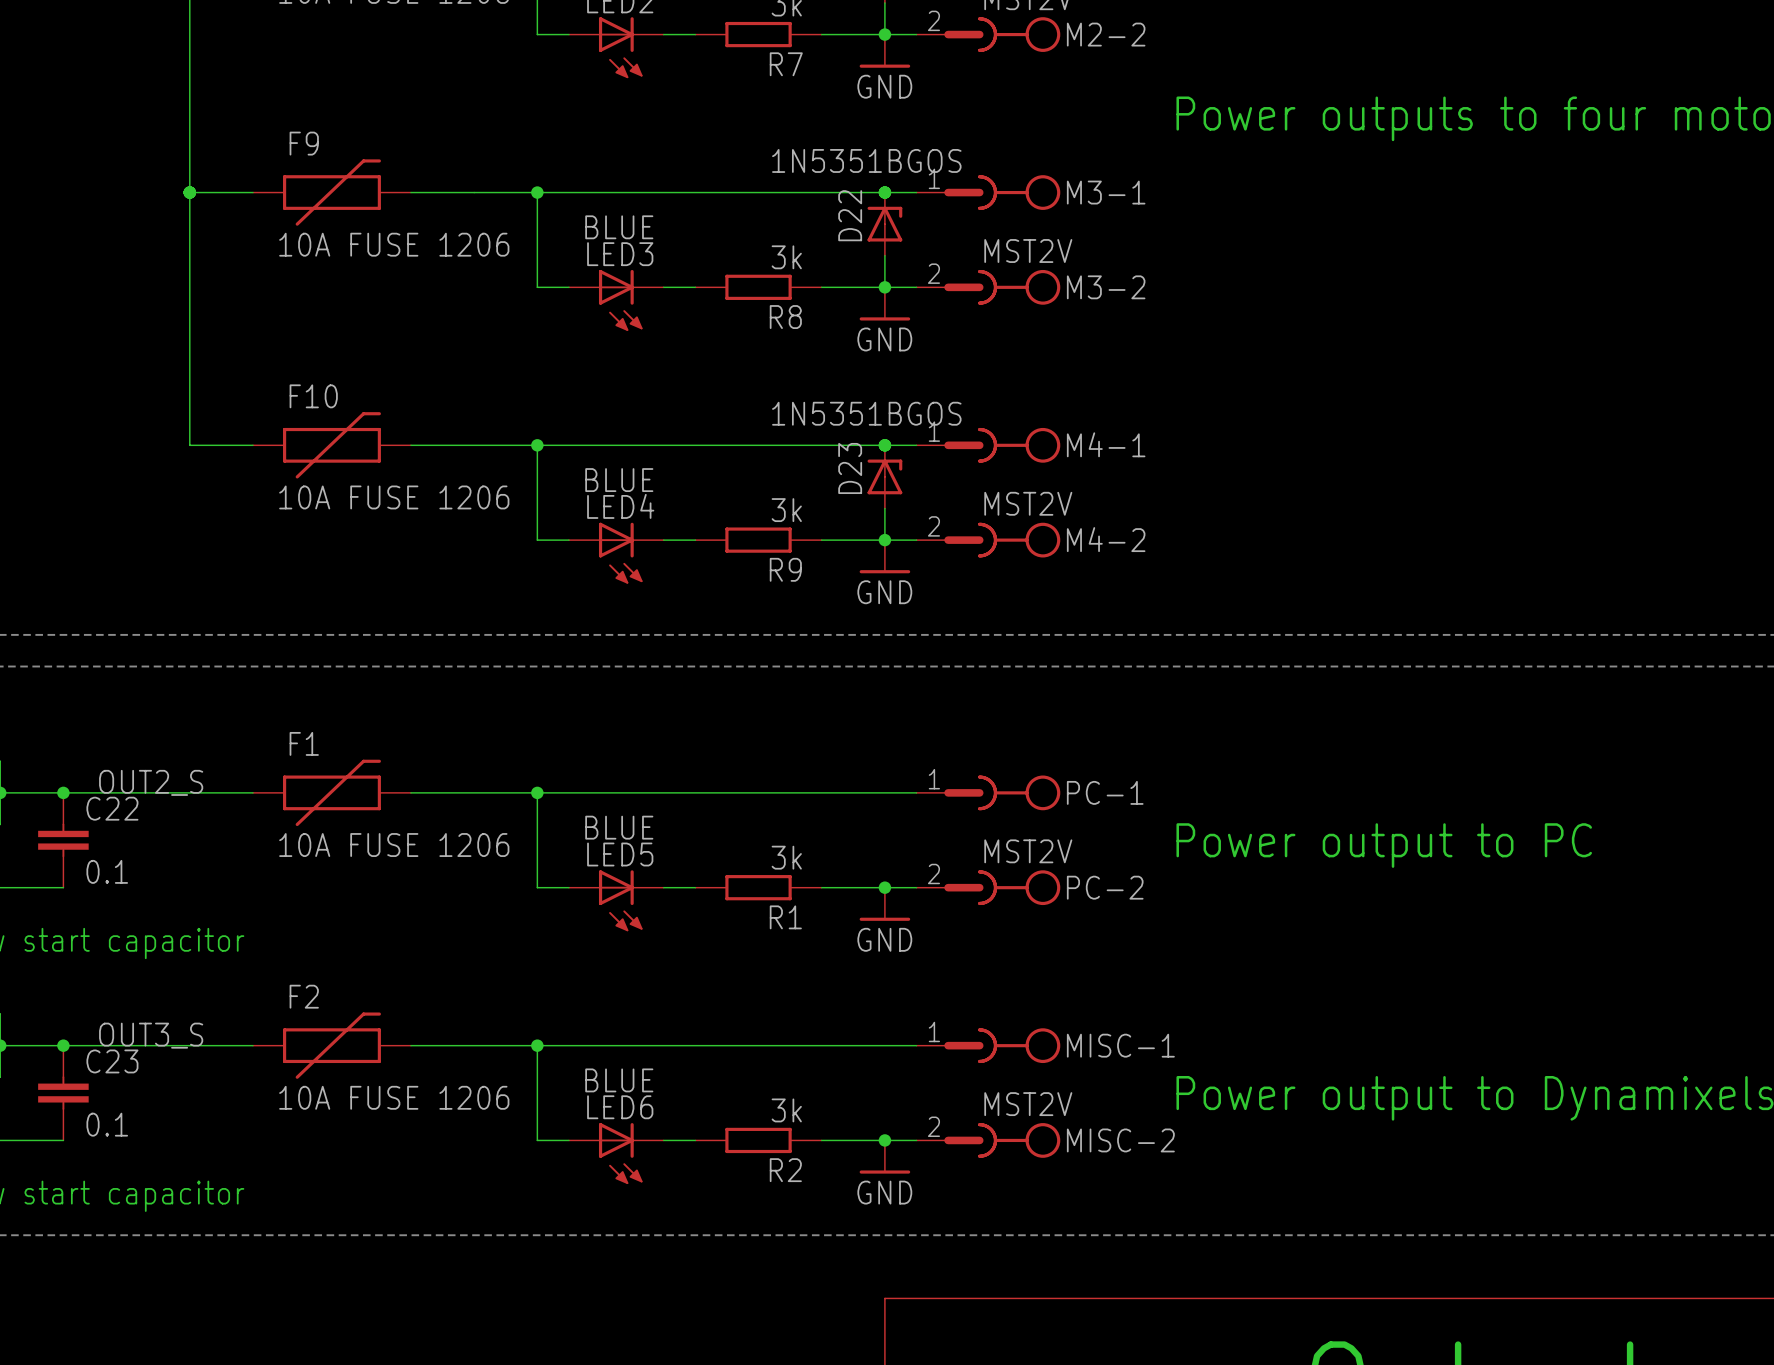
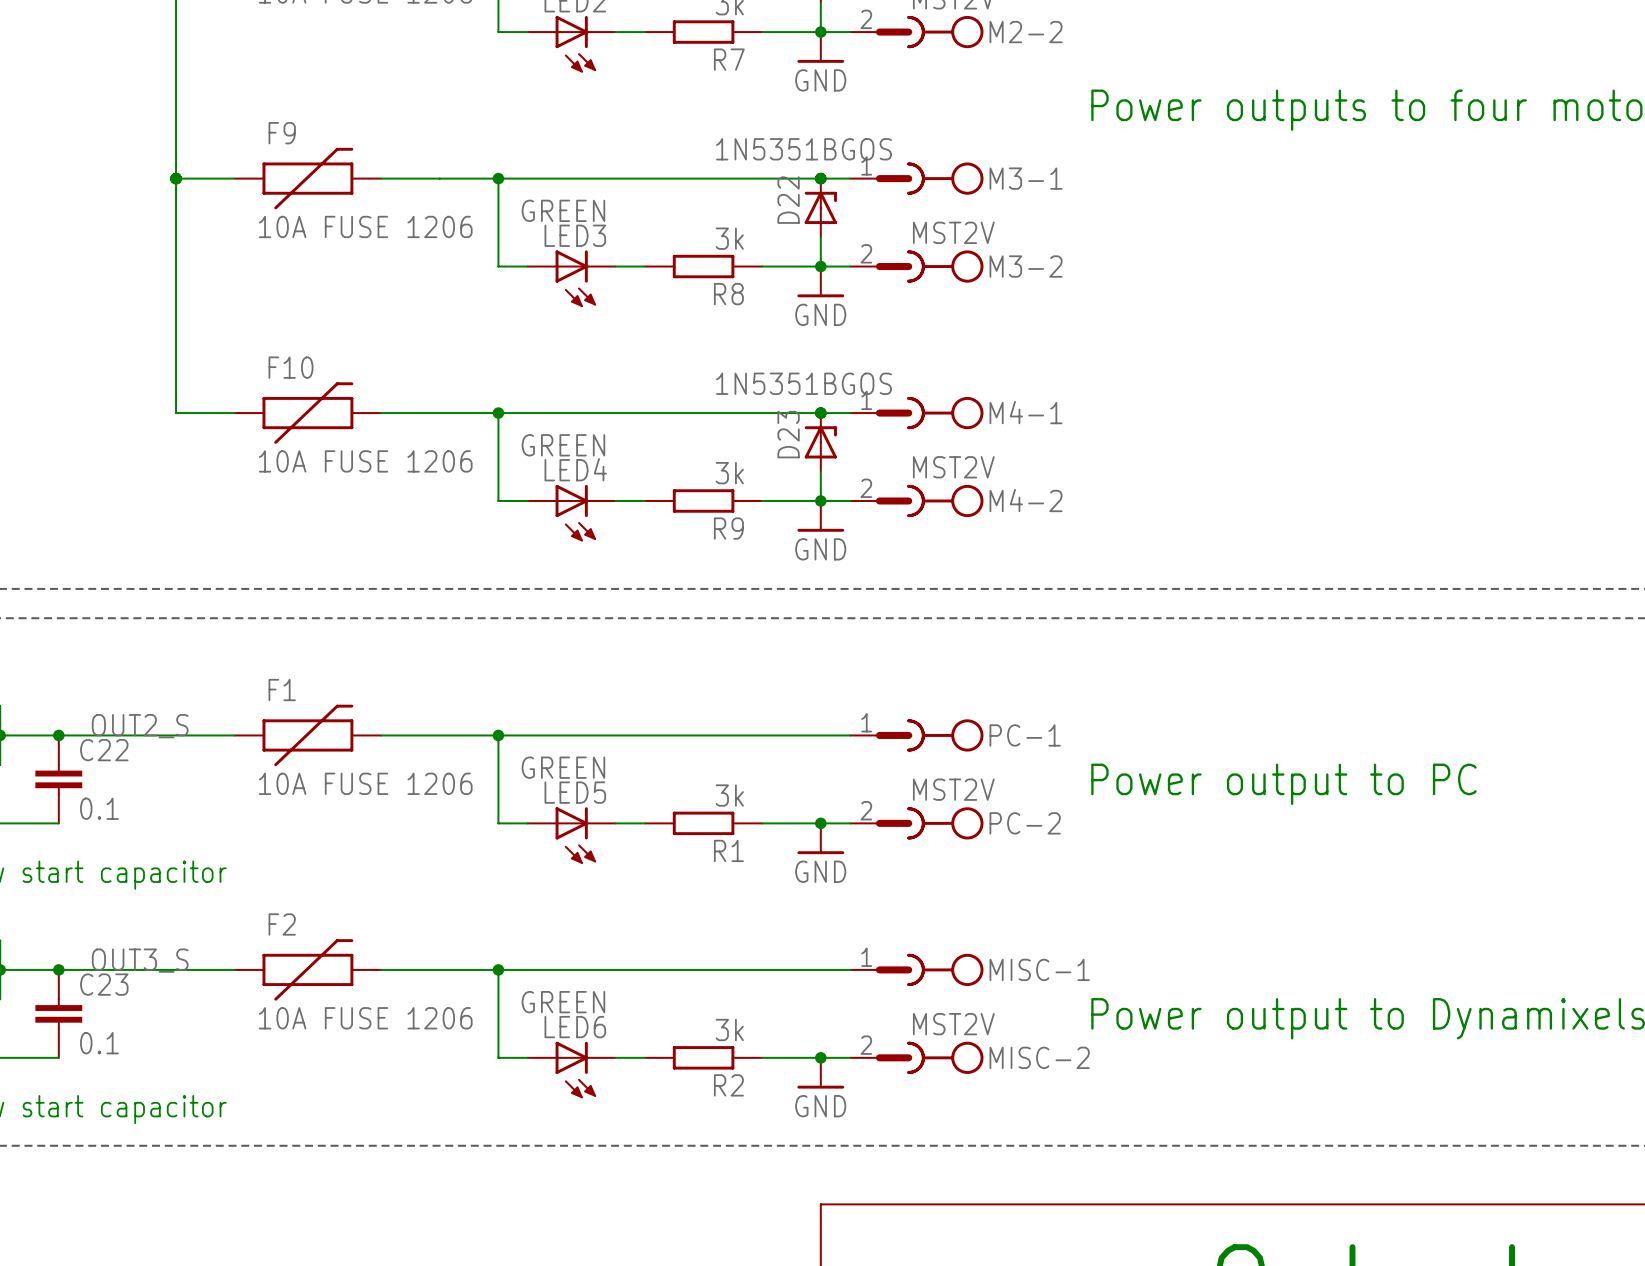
LED3 value: BLUE (619, 227) -> GREEN (563, 210)
LED4 value: BLUE (619, 480) -> GREEN (563, 445)
LED5 value: BLUE (619, 827) -> GREEN (563, 767)
LED6 value: BLUE (619, 1080) -> GREEN (563, 1002)

